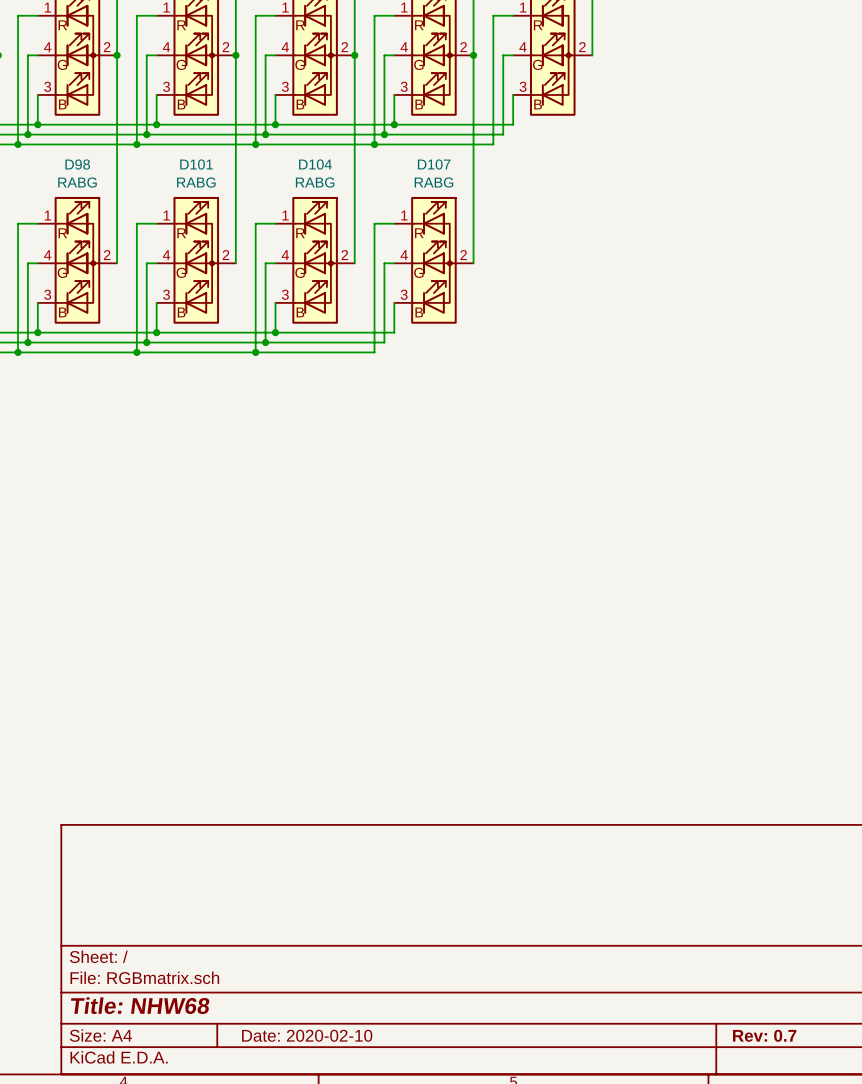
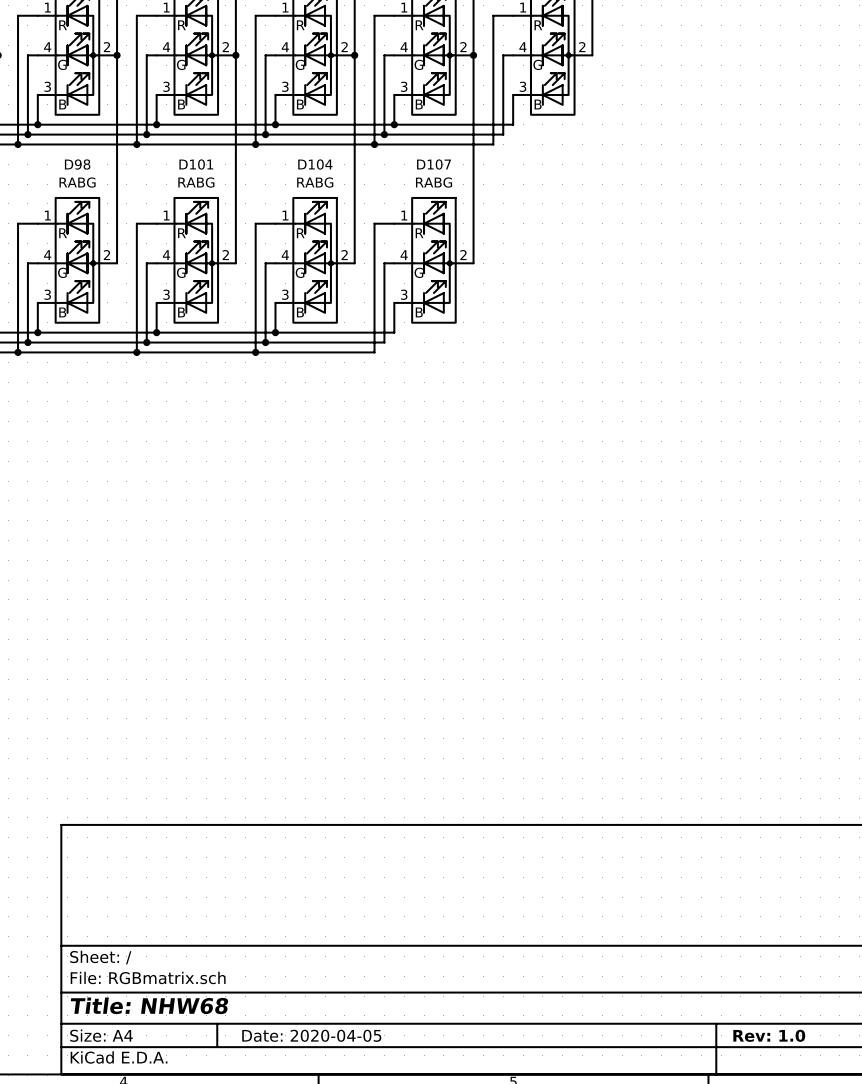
title block: Date: 2020-02-10 (307, 1035) -> Date: 2020-04-05 (311, 1035)
title block: Rev: 0.7 (764, 1035) -> Rev: 1.0 (769, 1035)

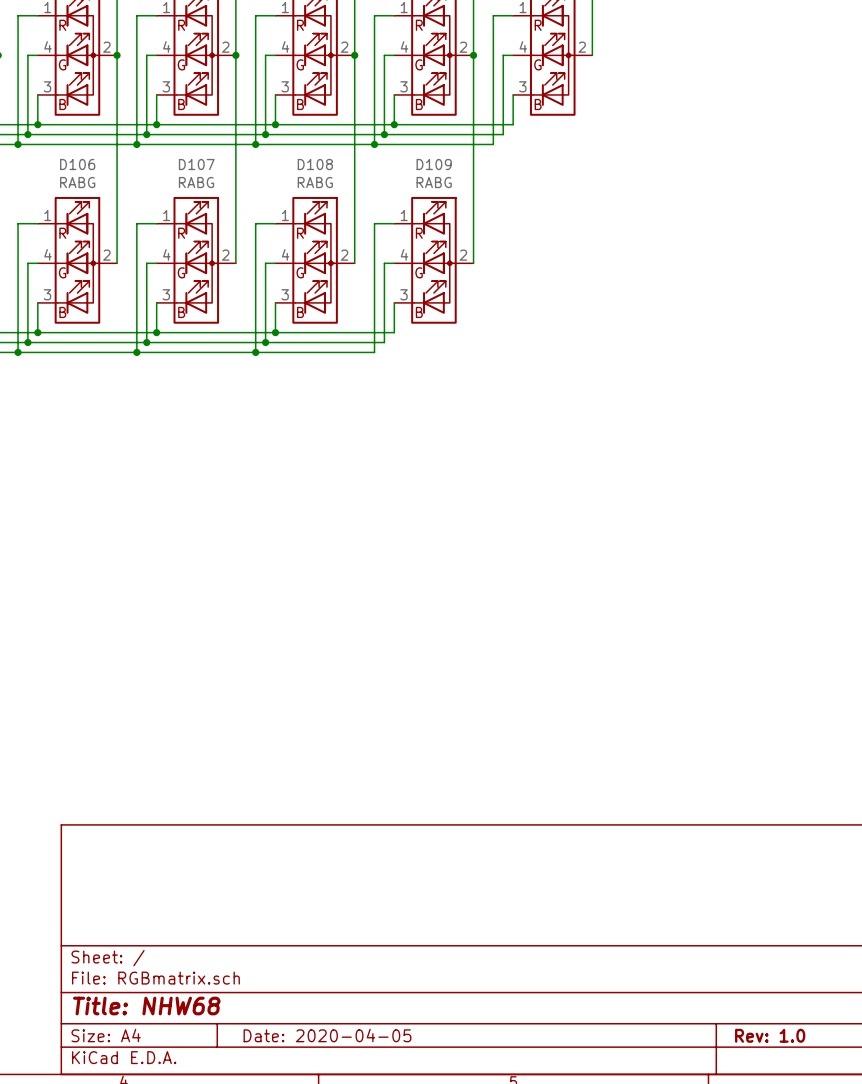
D98 name: D98 (77, 164) -> D106 (77, 164)
D101 name: D101 (196, 164) -> D107 (196, 164)
D104 name: D104 (315, 164) -> D108 (315, 164)
D107 name: D107 (434, 164) -> D109 (434, 164)

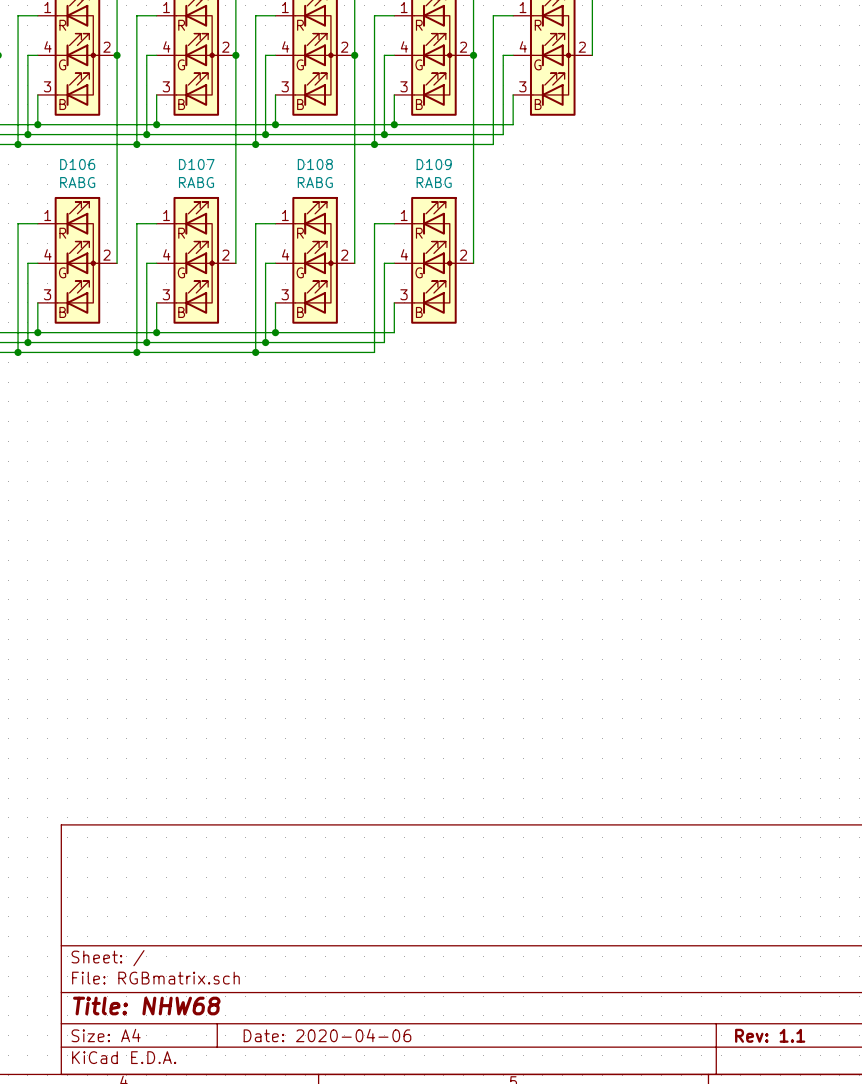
title block: Date: 2020-04-05 (327, 1035) -> Date: 2020-04-06 (327, 1035)
title block: Rev: 1.0 (770, 1035) -> Rev: 1.1 (770, 1035)

